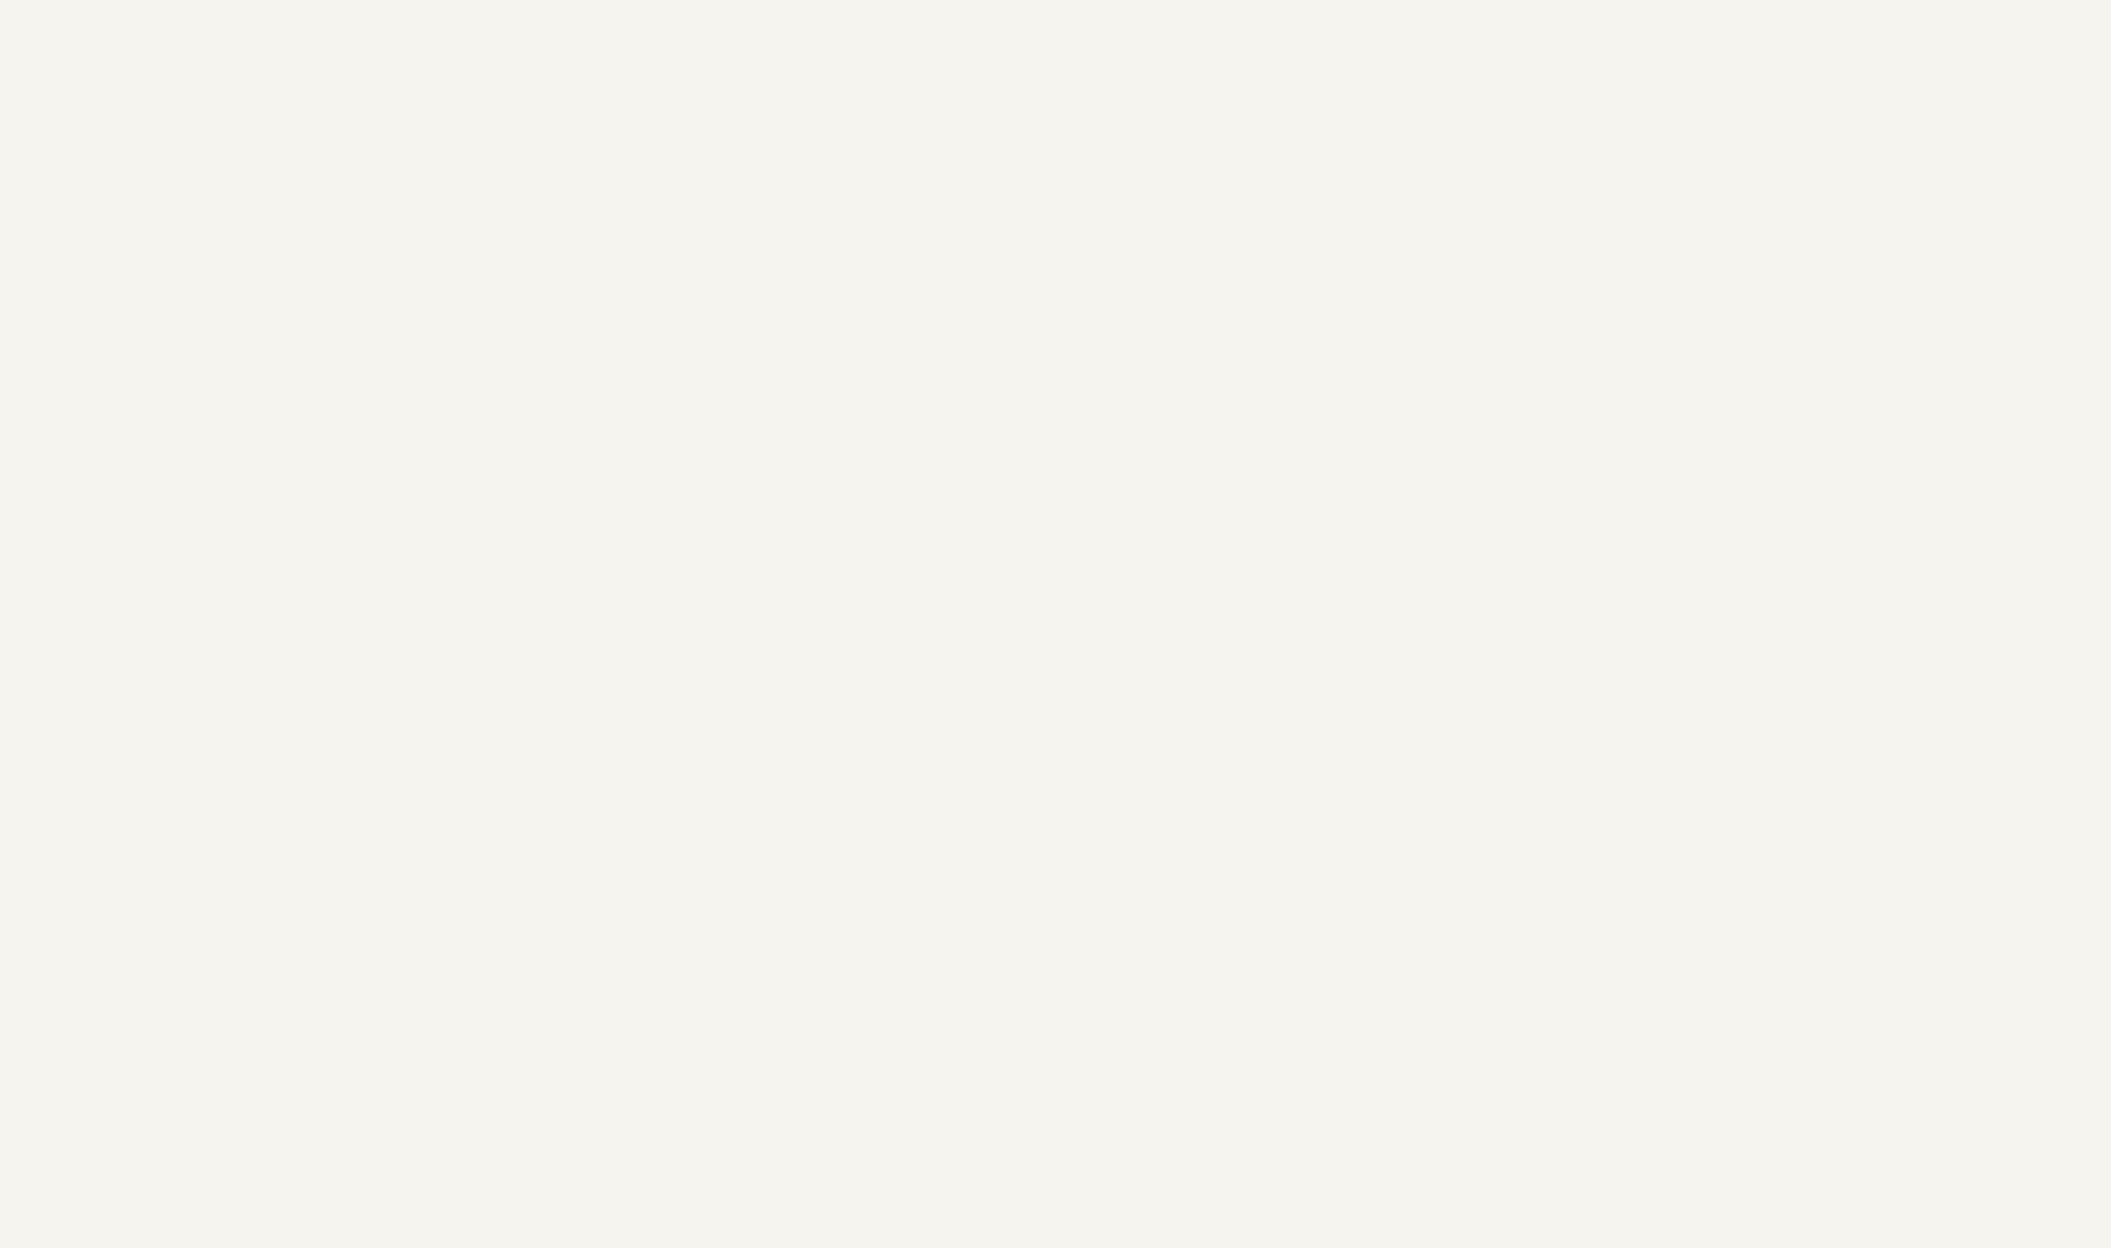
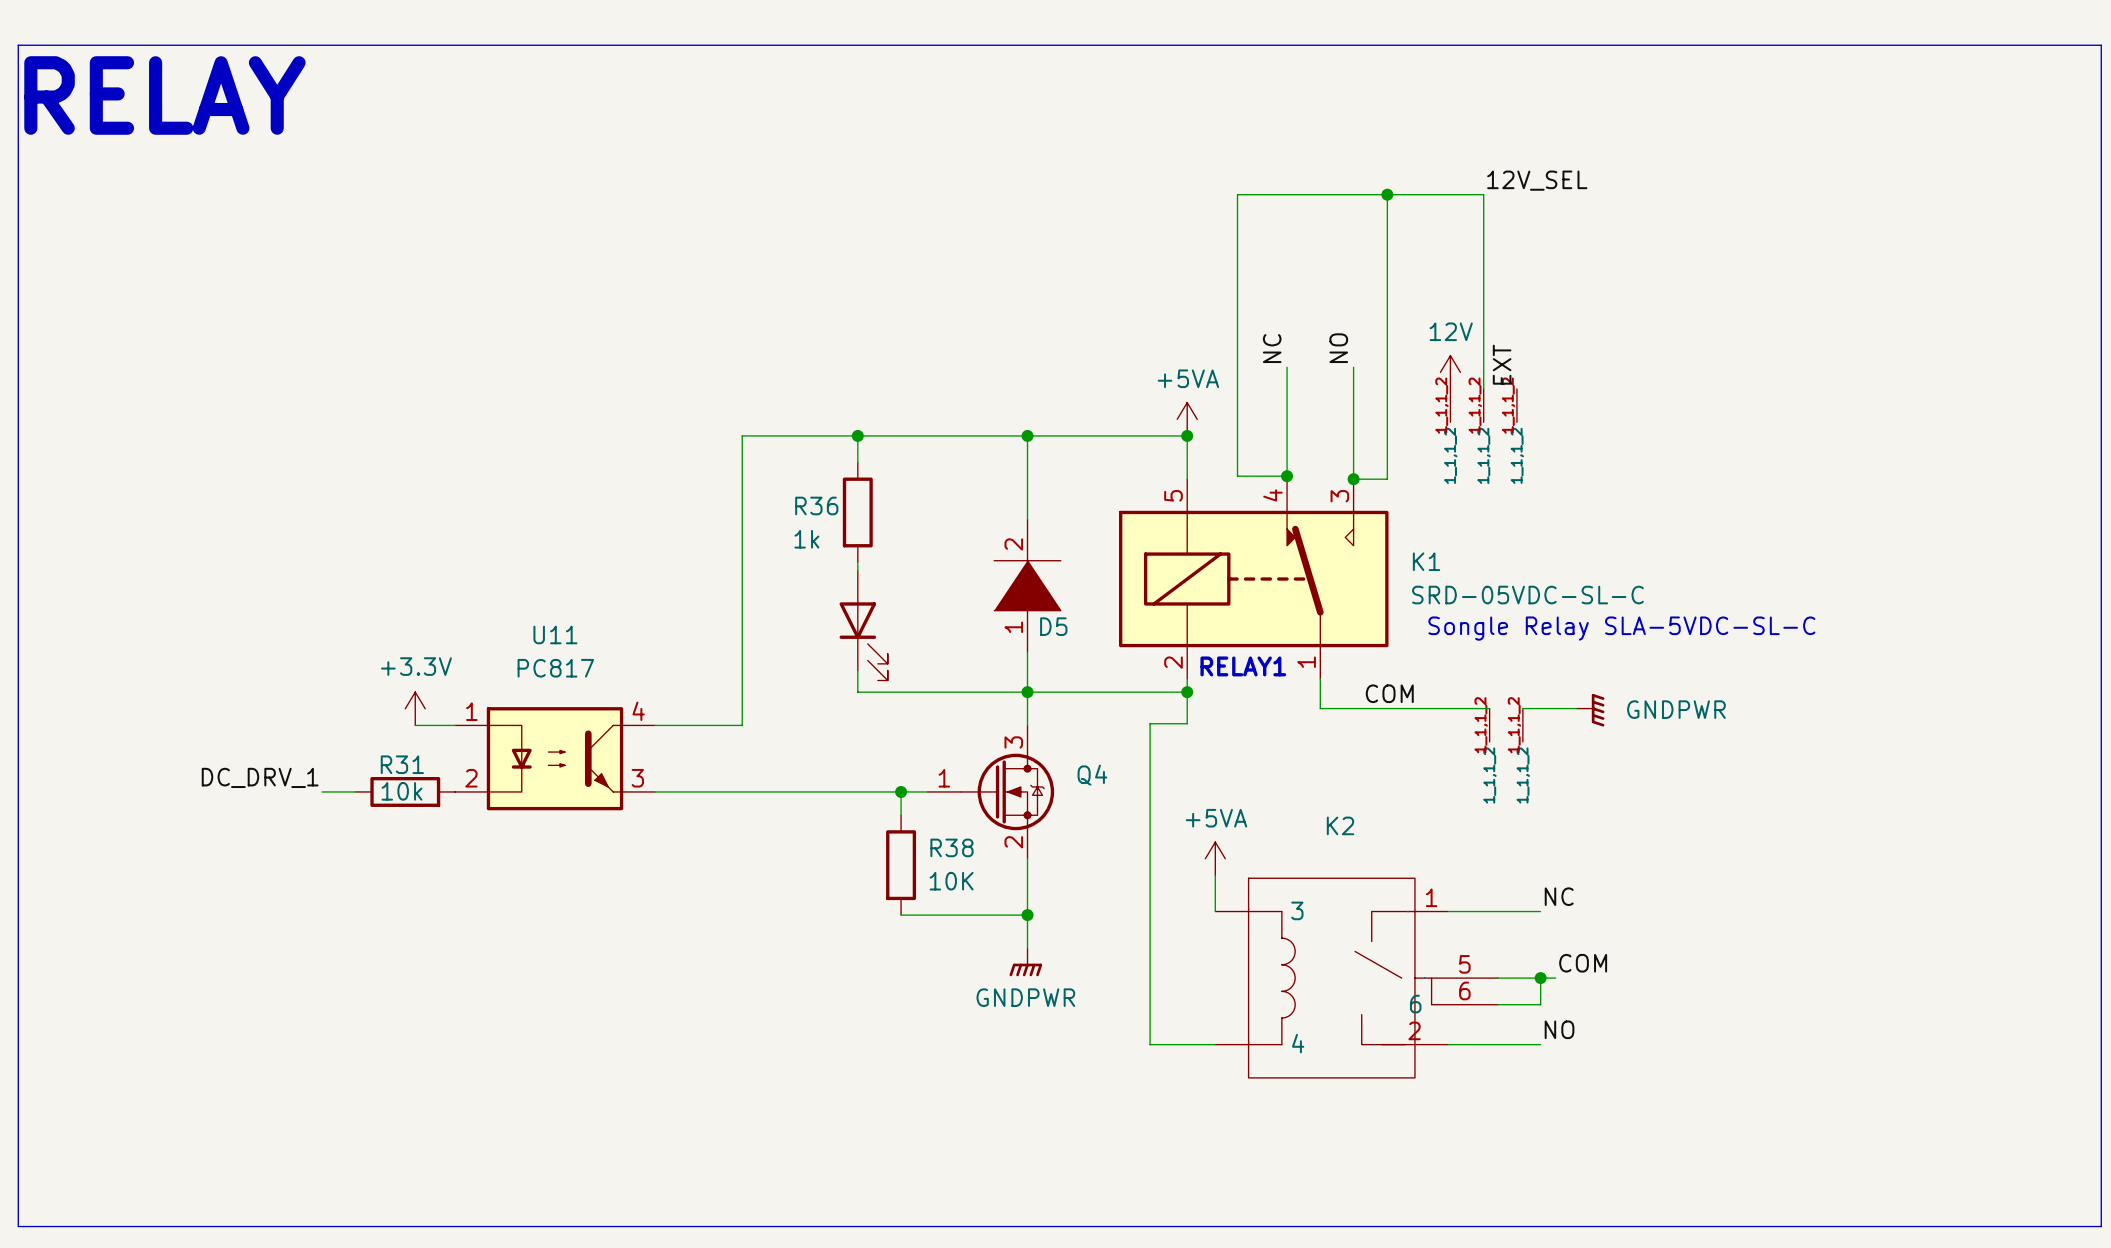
line: none -> (18, 45) (2101, 45) (2101, 1226) (18, 1226) (18, 45)
text: none -> RELAY (164, 95)
label: none -> 12V_SEL (1537, 180)
wire: none -> (1387, 194) (1387, 479) (1353, 479) (1353, 367)
junction: none -> (1387, 194)
label: none -> NC (1272, 348)
label: none -> NO (1338, 348)
label: none -> EXT (1502, 364)
wire: none -> (1287, 367) (1287, 479)
power symbol: none -> 12V (1450, 372)
wire: none -> (1483, 388) (1483, 194) (1237, 194) (1237, 476) (1287, 476)
part: none -> (1450, 405)
part: none -> (1483, 405)
part: none -> (1516, 405)
power symbol: none -> +5VA (1187, 419)
wire: none -> (857, 435) (857, 462)
junction: none -> (857, 435)
wire: none -> (1027, 435) (1027, 519)
junction: none -> (1027, 435)
junction: none -> (1187, 435)
junction: none -> (1287, 476)
wire: none -> (1187, 479) (1187, 435) (742, 435) (742, 725) (654, 725)
junction: none -> (1353, 479)
R36: none -> 1k (857, 512)
wire: none -> (857, 562) (857, 570)
K1: none -> SRD-05VDC-SL-C (1253, 579)
D5: none -> (1027, 585)
part: none -> (863, 625)
text: none -> Songle Relay SLA-5VDC-SL-C (1621, 628)
wire: none -> (1027, 652) (1027, 725)
text: none -> RELAY1 (1243, 666)
wire: none -> (857, 670) (857, 692) (1187, 692)
wire: none -> (1187, 678) (1187, 723) (1150, 723) (1150, 1044) (1215, 1044)
wire: none -> (1320, 678) (1320, 708) (1489, 708)
junction: none -> (1027, 692)
junction: none -> (1187, 692)
label: none -> COM (1389, 693)
power symbol: none -> +3.3V (415, 708)
wire: none -> (1522, 708) (1576, 708)
power symbol: none -> GNDPWR (1590, 710)
wire: none -> (415, 725) (455, 725)
part: none -> (1489, 725)
part: none -> (1522, 725)
U11: none -> PC817 (555, 758)
label: none -> DC_DRV_1 (260, 777)
wire: none -> (322, 791) (355, 791)
R31: none -> 10k (405, 791)
wire: none -> (654, 791) (927, 791)
wire: none -> (901, 791) (901, 815)
junction: none -> (901, 791)
Q4: none -> (990, 791)
wire: none -> (1027, 858) (1027, 948)
power symbol: none -> +5VA (1215, 858)
R38: none -> 10K (901, 865)
wire: none -> (1215, 875) (1215, 911)
label: none -> NC (1559, 896)
wire: none -> (1448, 911) (1540, 911)
wire: none -> (901, 915) (1027, 915)
junction: none -> (1027, 915)
power symbol: none -> GNDPWR (1025, 962)
label: none -> COM (1583, 963)
K2: none -> (1356, 978)
wire: none -> (1498, 978) (1555, 978)
wire: none -> (1540, 978) (1540, 1004) (1498, 1004)
junction: none -> (1540, 978)
label: none -> NO (1559, 1029)
wire: none -> (1448, 1044) (1540, 1044)

